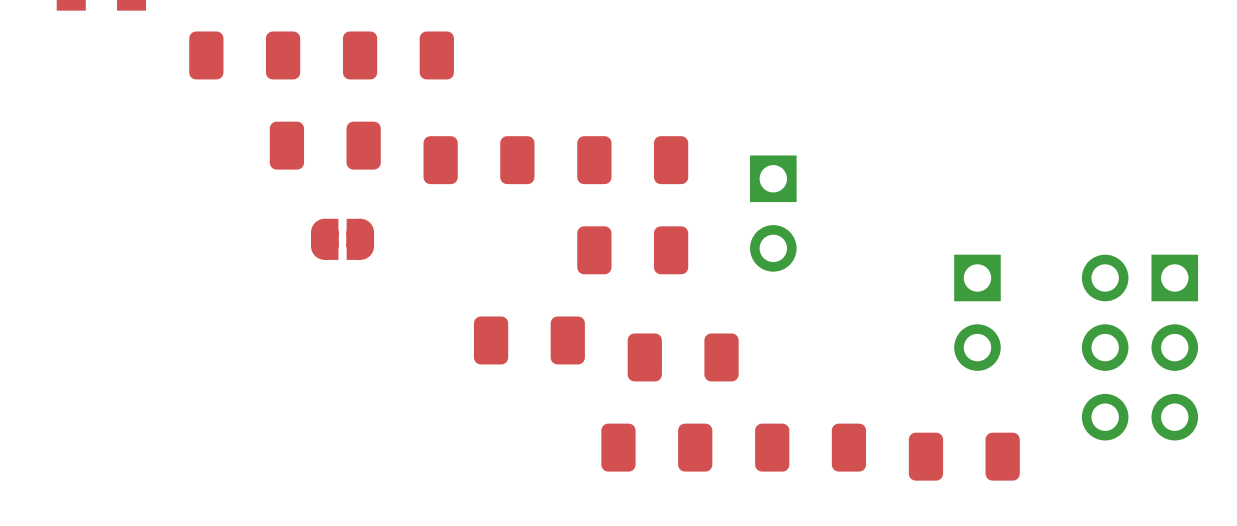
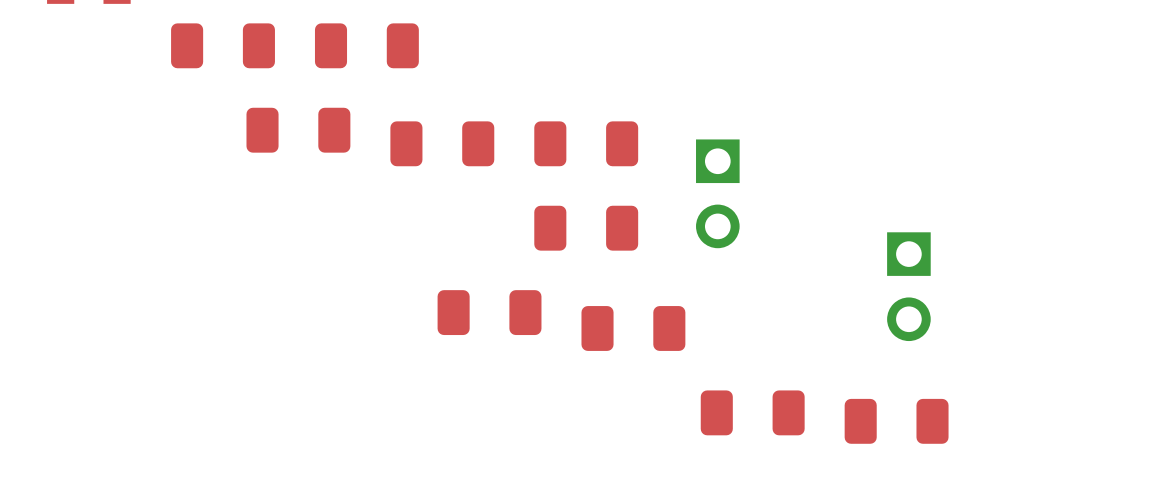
part: (342, 239) -> none
part: (1139, 347) -> none
part: (656, 447) -> none

